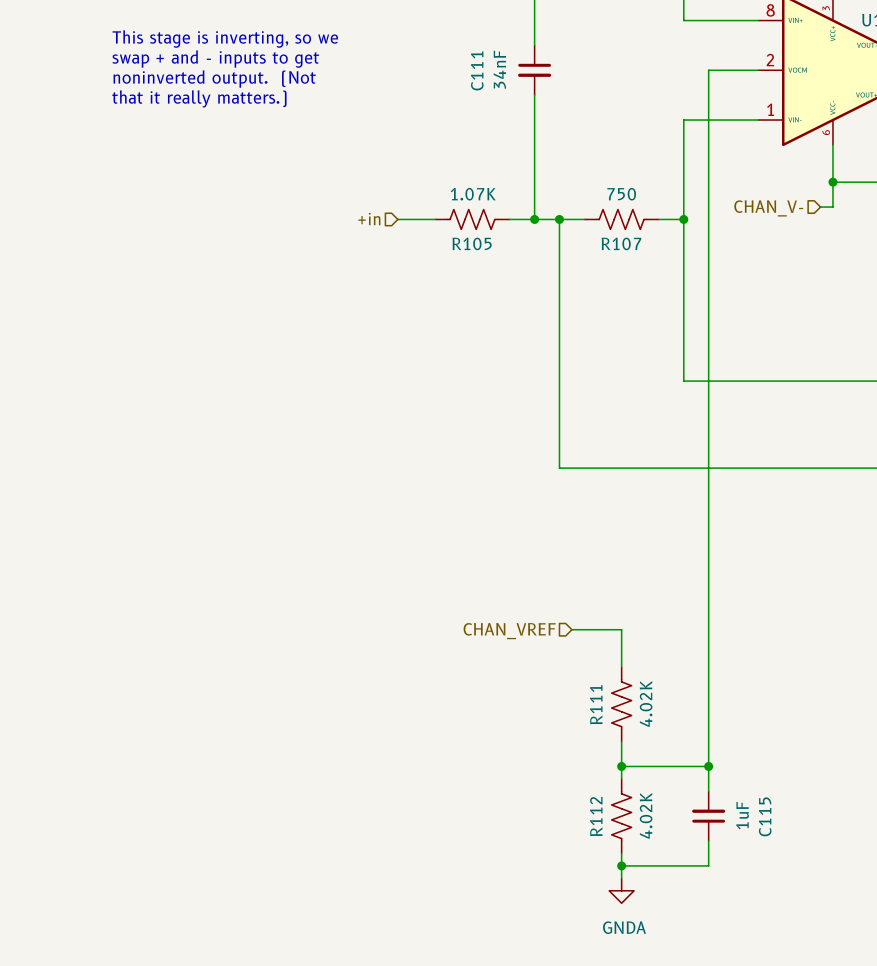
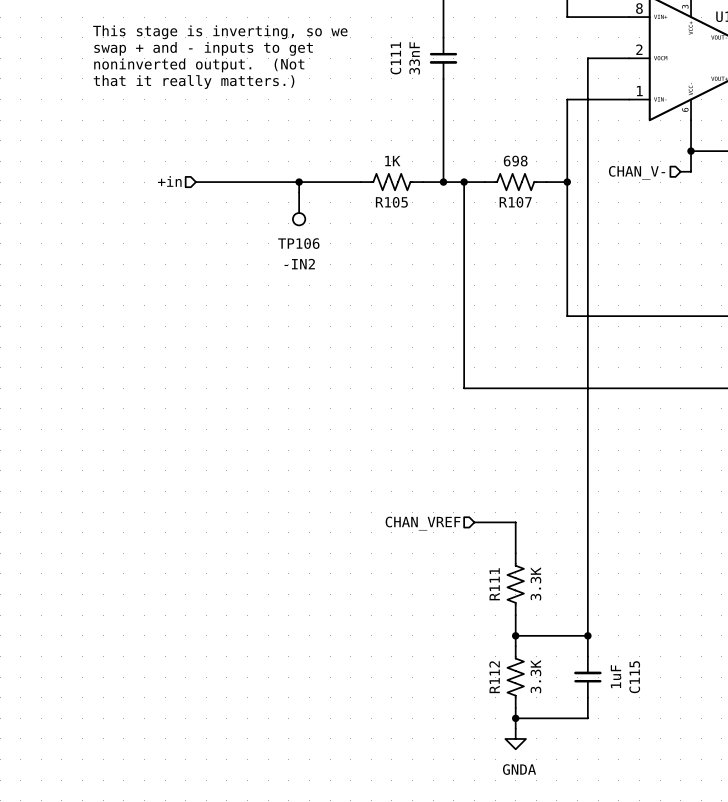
C111 value: 34nF (499, 69) -> 33nF (414, 58)
R105 value: 1.07K (473, 194) -> 1K (392, 161)
R107 value: 750 (621, 194) -> 698 (515, 161)
wire: none -> (195, 182) (330, 182)
wire: none -> (299, 182) (299, 192)
junction: none -> (299, 182)
hierarchical label position: +in (369, 219) -> +in (169, 181)
TP106: none -> -IN2 (299, 208)
R111 value: 4.02K (646, 703) -> 3.3K (535, 583)
R112 value: 4.02K (646, 815) -> 3.3K (535, 676)

